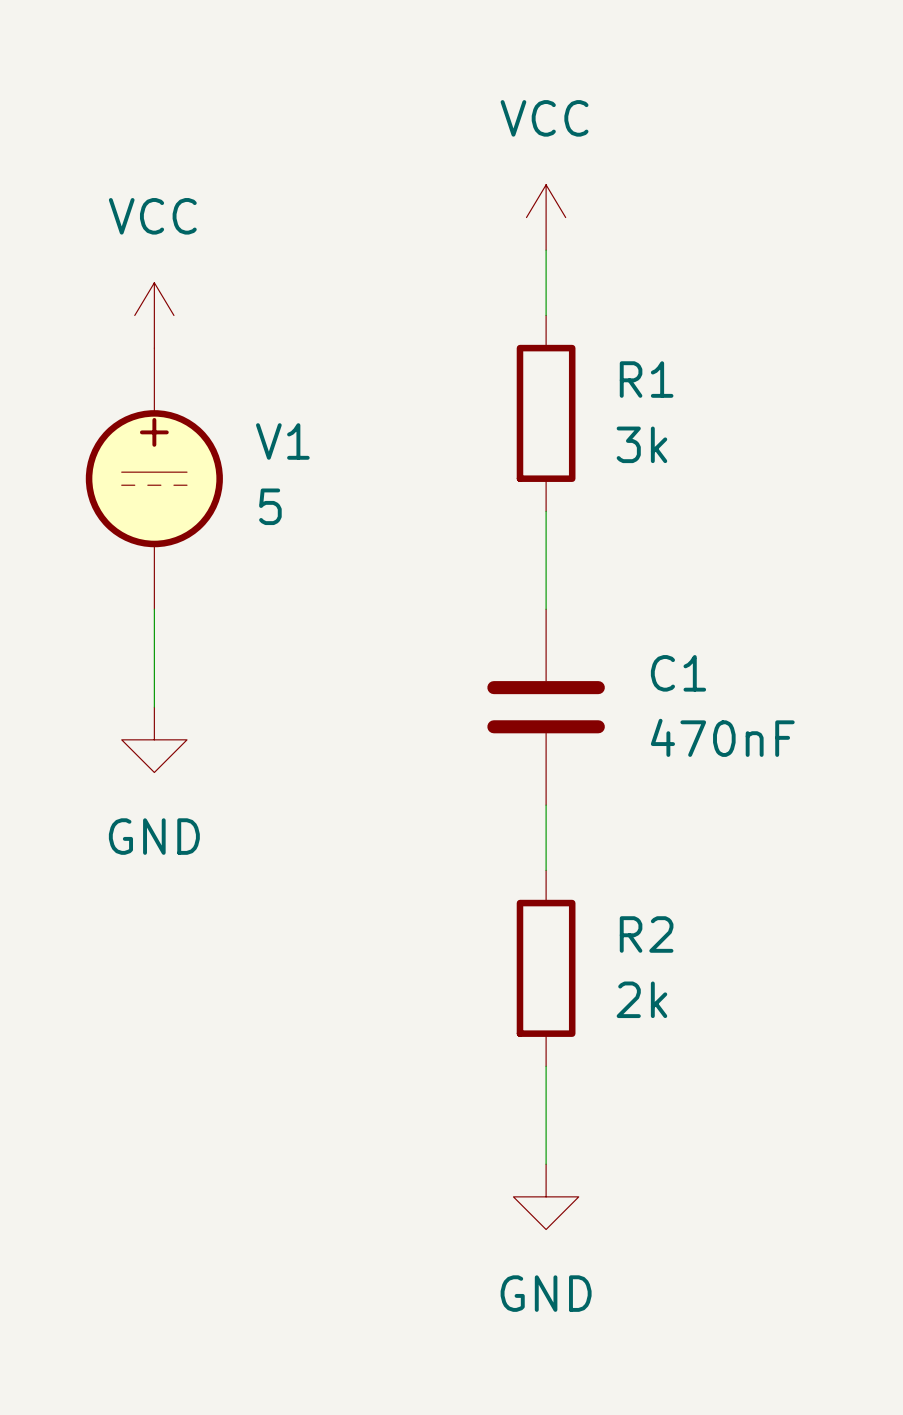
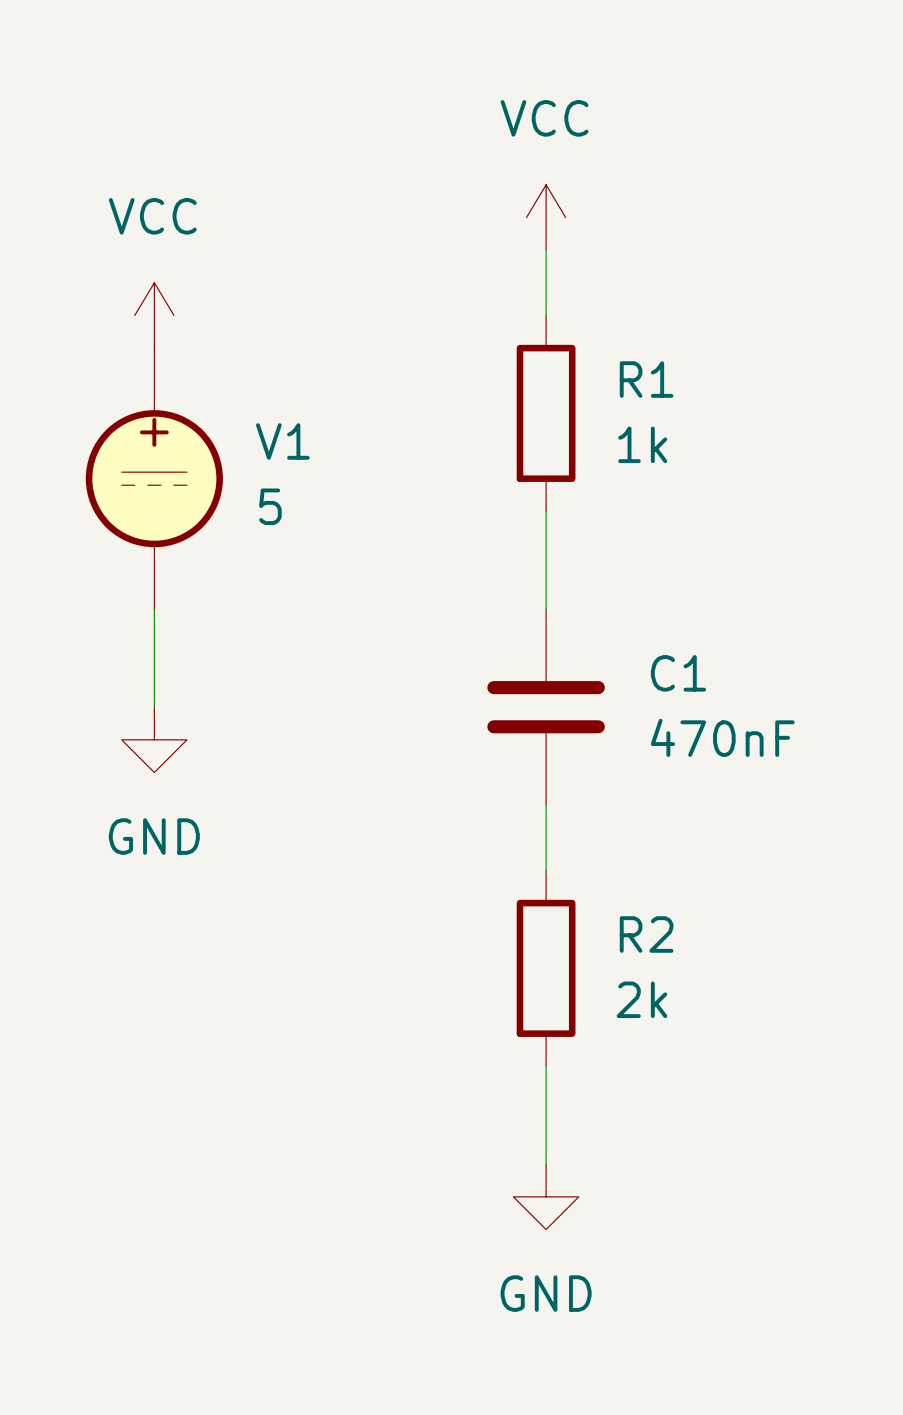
R1 value: 3k (641, 444) -> 1k (642, 444)

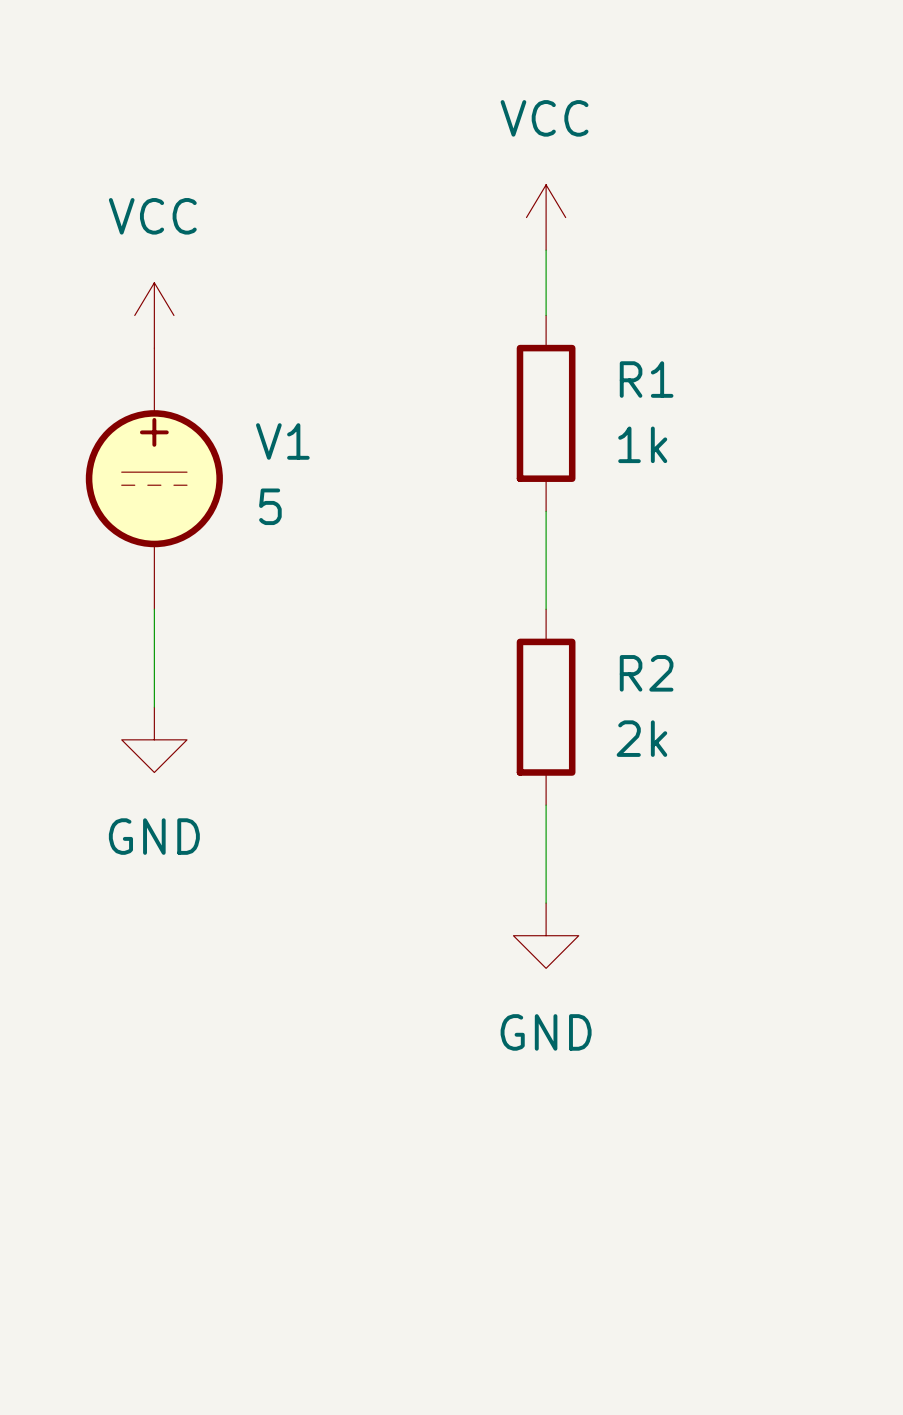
C1: 470nF (546, 707) -> none
R2 position: (546, 968) -> (546, 707)
wire: (546, 1066) (546, 1164) -> none
power symbol position: GND (546, 1196) -> GND (546, 935)

